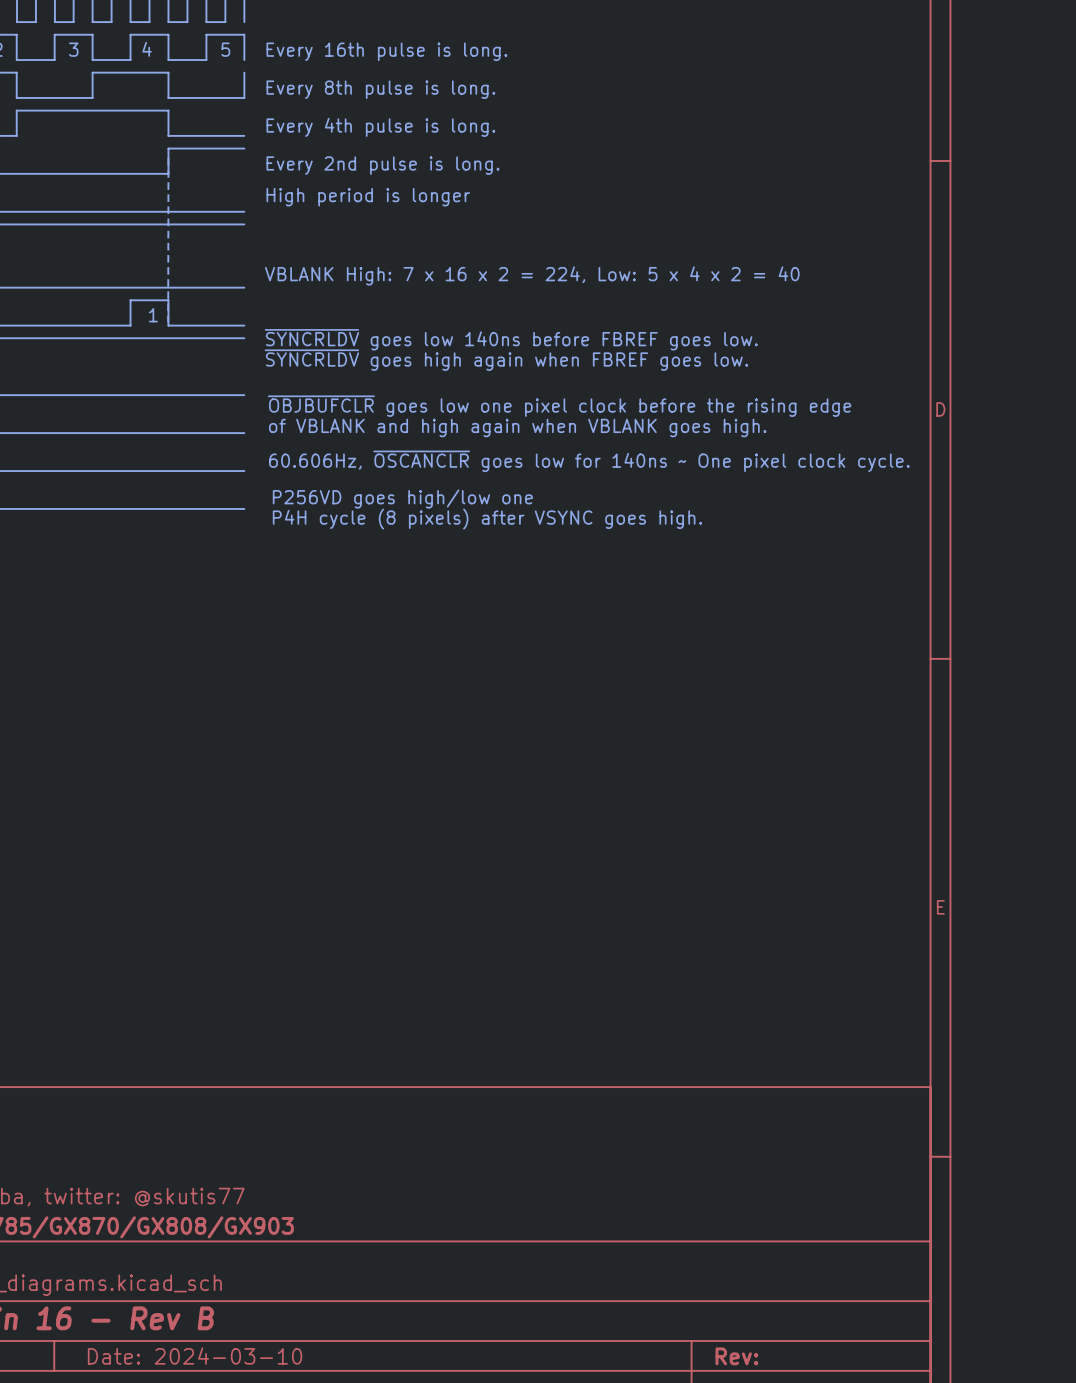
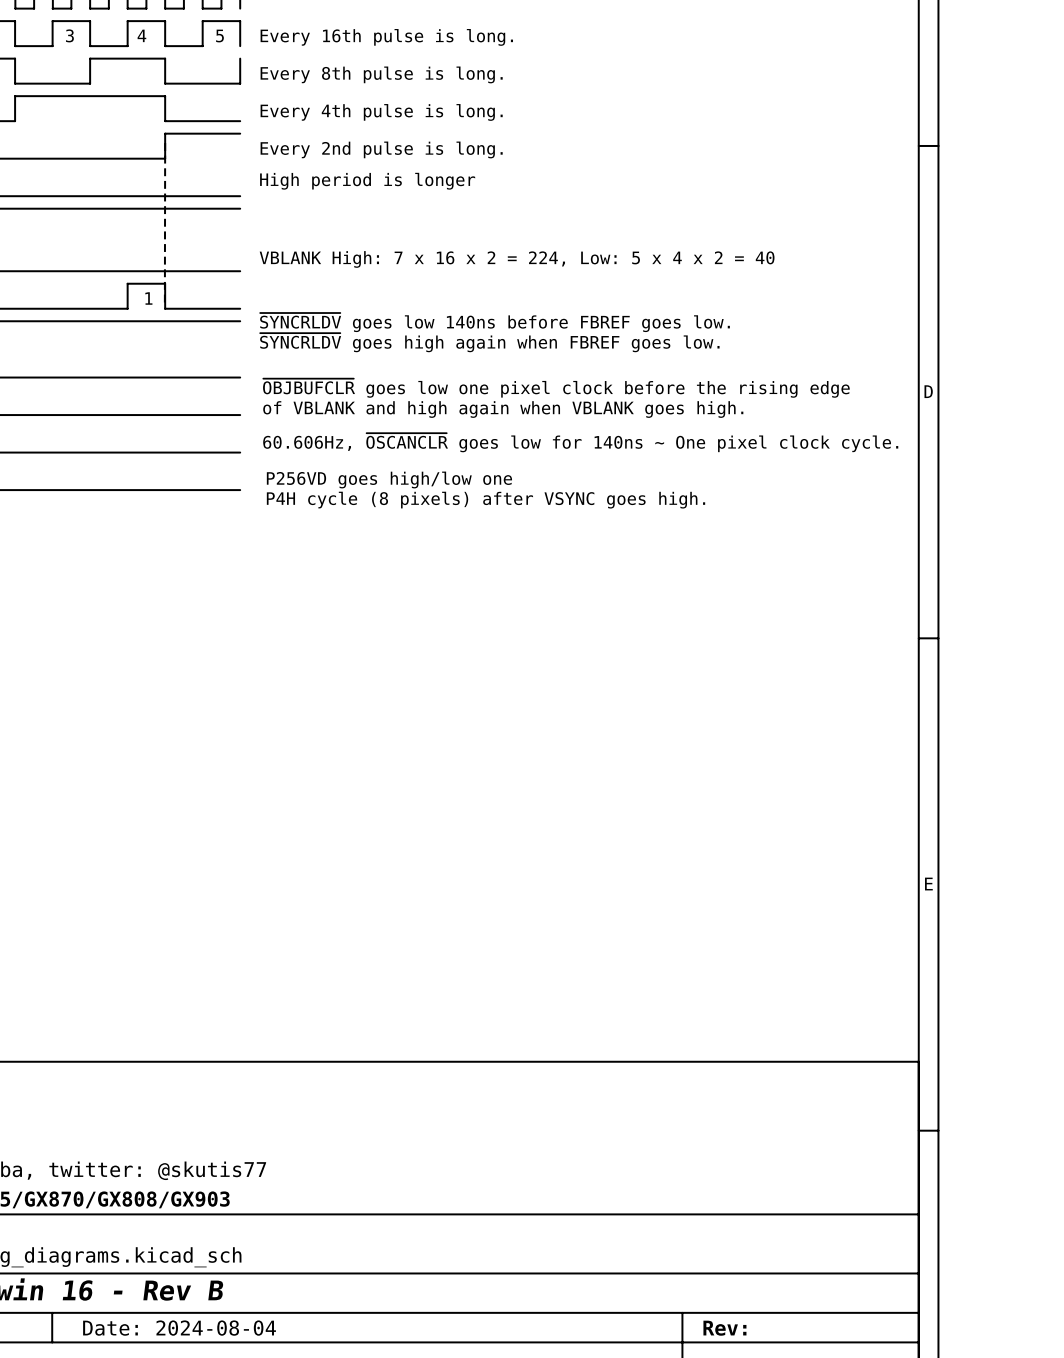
title block: Date: 2024-03-10 (195, 1356) -> Date: 2024-08-04 (179, 1328)

